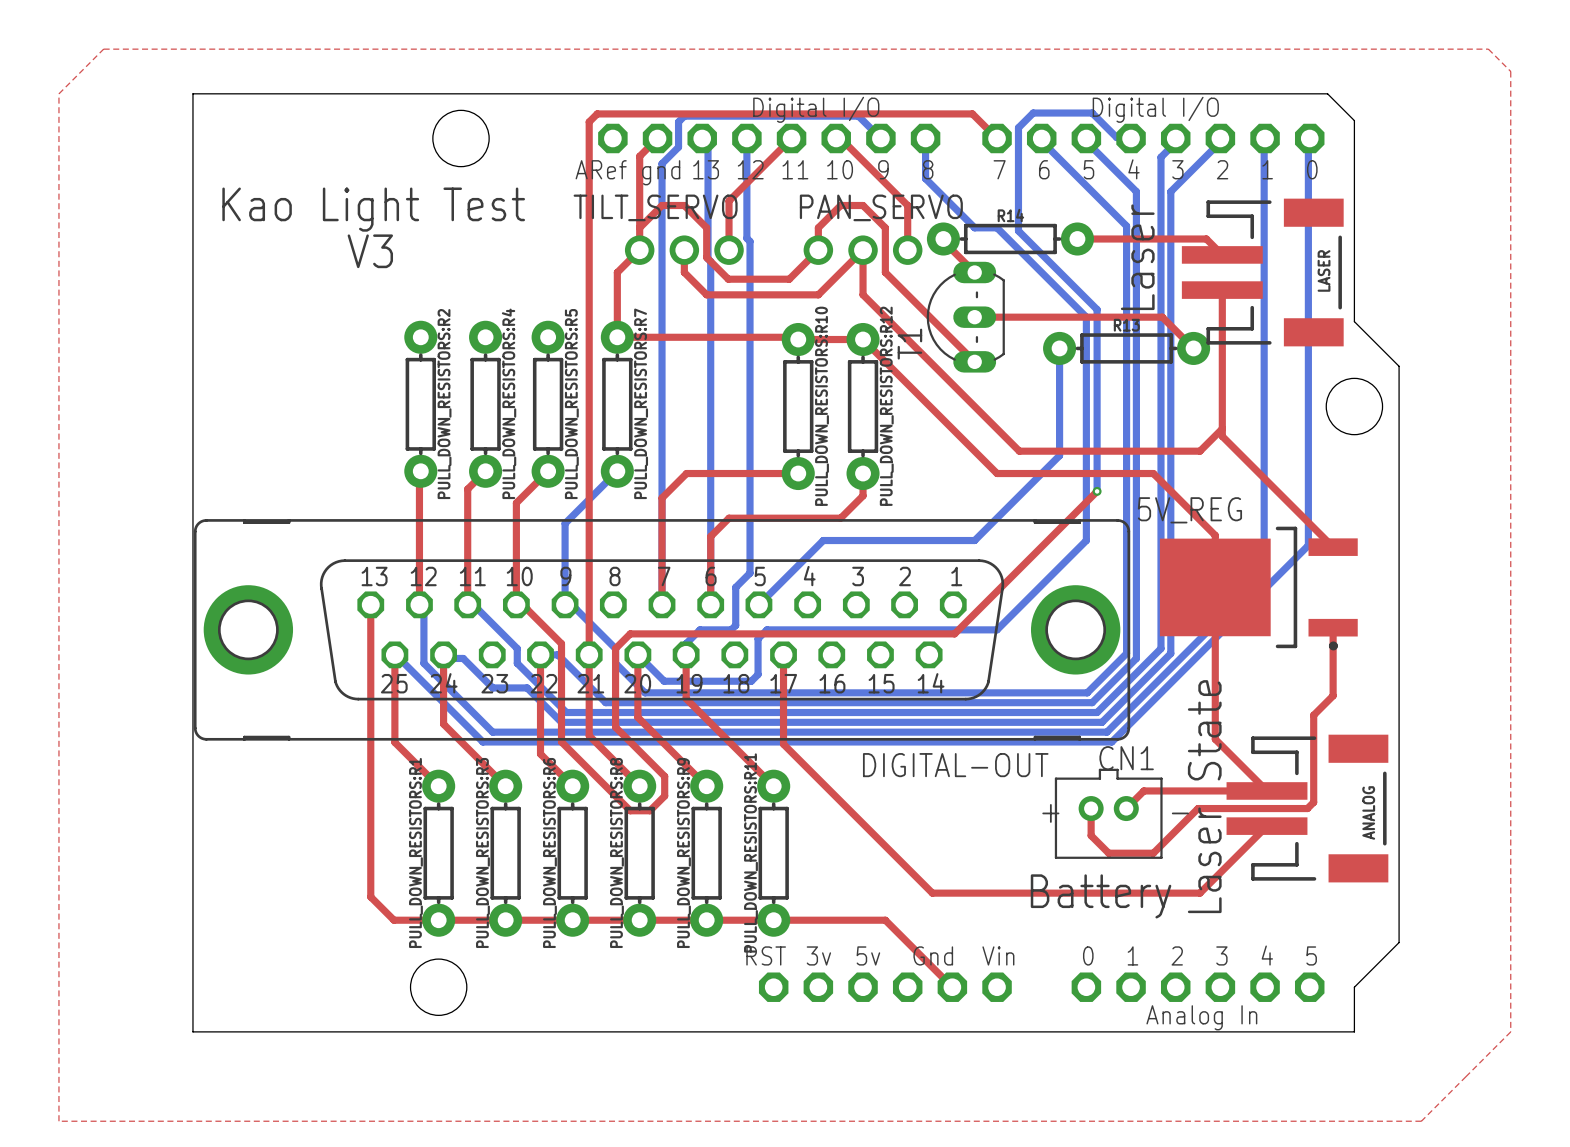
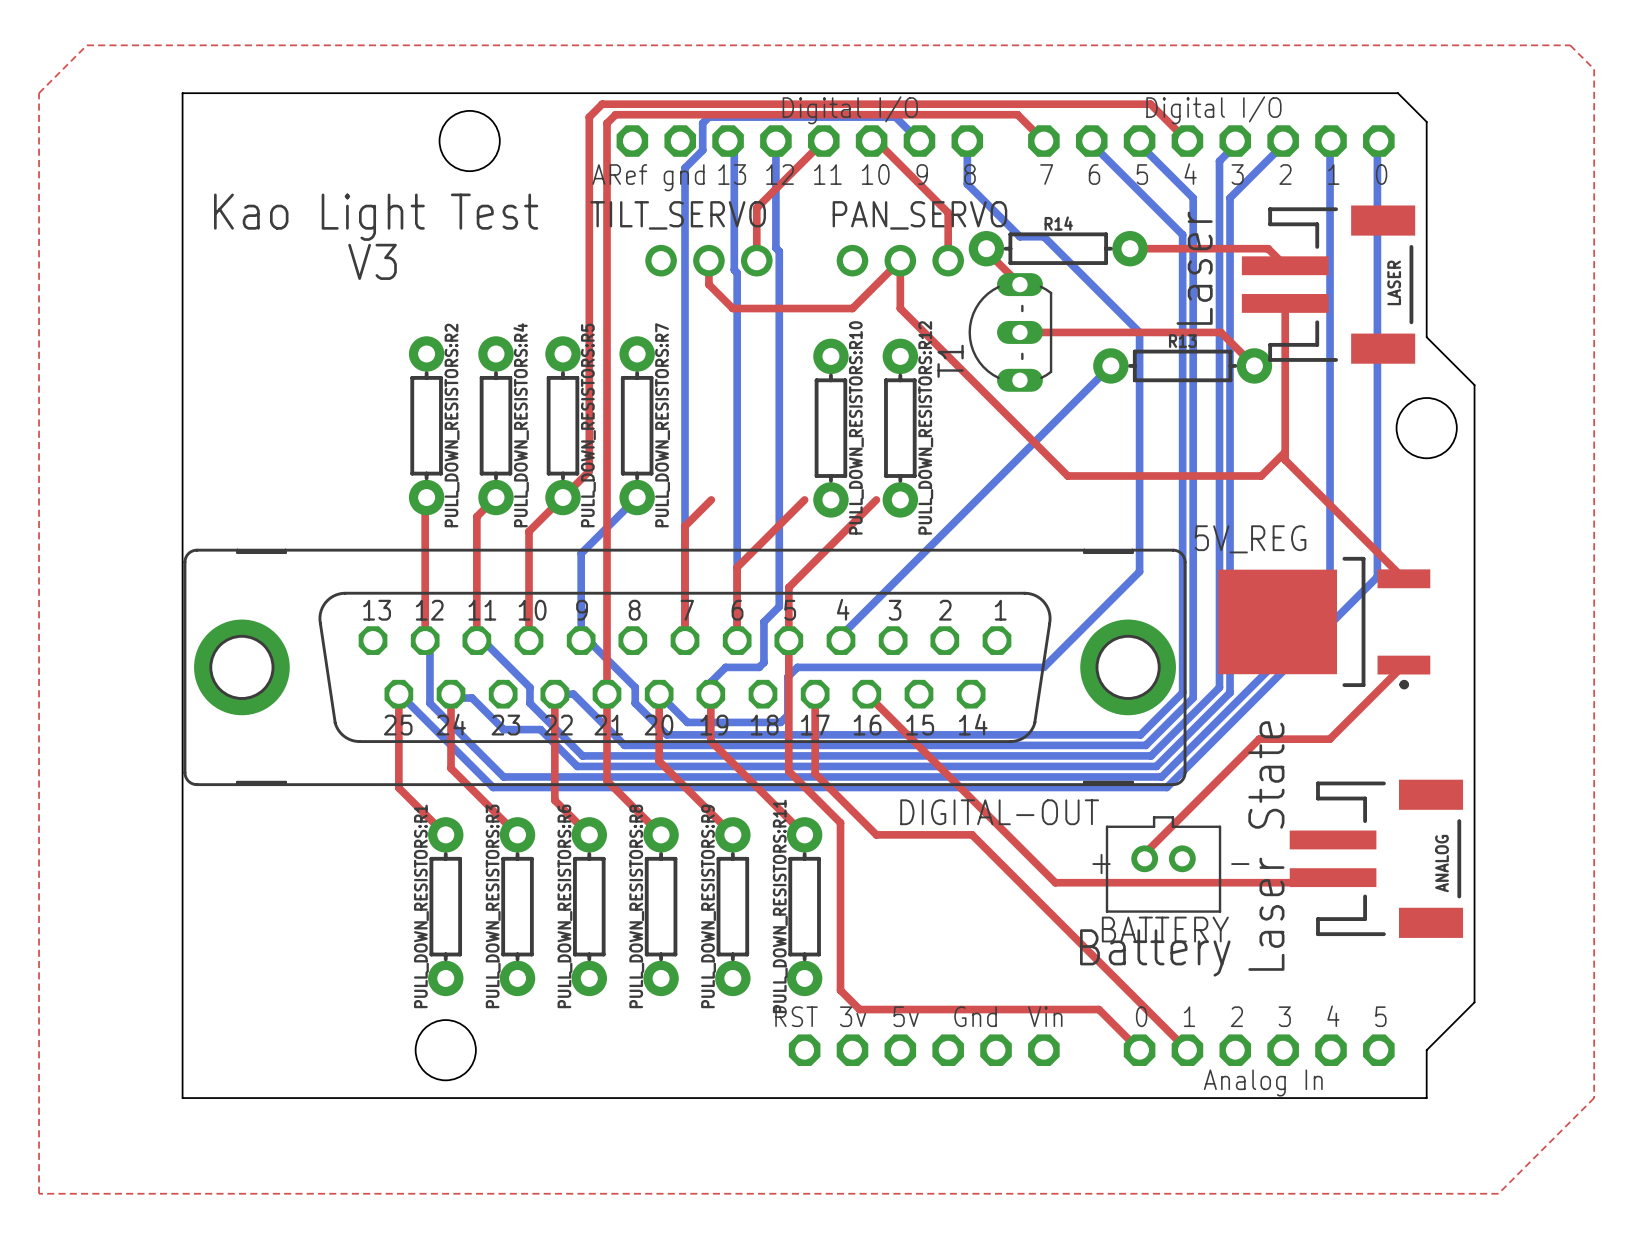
top track: (657, 138) (639, 156) (639, 250) (617, 272) (617, 337) (796, 337) (798, 339) (863, 339) (997, 473) (1153, 473) (1215, 535) (1215, 739) (1266, 790) (1143, 790) (1126, 808) -> none
top track: none -> (1187, 141) (1150, 104) (602, 104) (589, 117) (589, 471) (562, 497)
bottom track: (1131, 138) (1116, 137) (1092, 113) (1033, 113) (1018, 127) (1018, 230) (1097, 309) (1097, 491) -> none
top track: (639, 227) (662, 205) (684, 205) (706, 227) (706, 257) (728, 279) (789, 279) (818, 250) (818, 227) (840, 205) (863, 205) (885, 227) (885, 272) (974, 361) -> none
bottom track: (1059, 348) (1059, 455) (974, 540) (823, 540) (758, 604) -> (1110, 365) (840, 635) (840, 640)
top track: (686, 473) (798, 473) -> none
top track: none -> (876, 499) (788, 587) (788, 771) (840, 822) (840, 990) (859, 1009) (1098, 1009) (1139, 1050)
top track: (863, 473) (863, 495) (840, 518) (729, 518) -> (804, 499) (756, 547)
top track: (1097, 491) (954, 633) (630, 633) (615, 648) (615, 727) (664, 776) (664, 796) (649, 810) (630, 810) (561, 741) (561, 643) (527, 609) -> none
via: (1097, 491) -> none
top track: (370, 604) (370, 896) (393, 920) (885, 920) (952, 987) -> none
top track: (1333, 627) (1333, 695) (1313, 715) (1313, 802) (1307, 808) (1198, 808) (1153, 853) (1108, 853) (1091, 835) (1091, 808) -> (1403, 665) (1329, 739) (1259, 739) (1144, 853) (1144, 858)
top track: (783, 729) (783, 744) (932, 893) (1199, 893) (1262, 830) -> (866, 694) (1055, 882) (1327, 882)
top track: none -> (815, 773) (876, 834) (972, 834) (1187, 1050)
CN1 name: CN1 (1126, 758) -> BATTERY (1165, 929)

